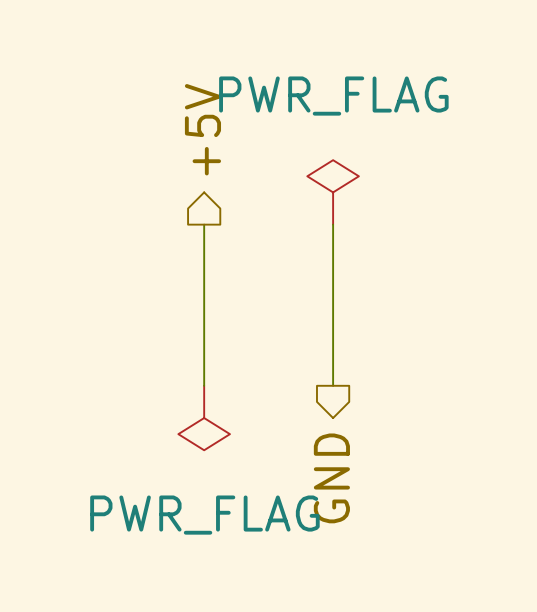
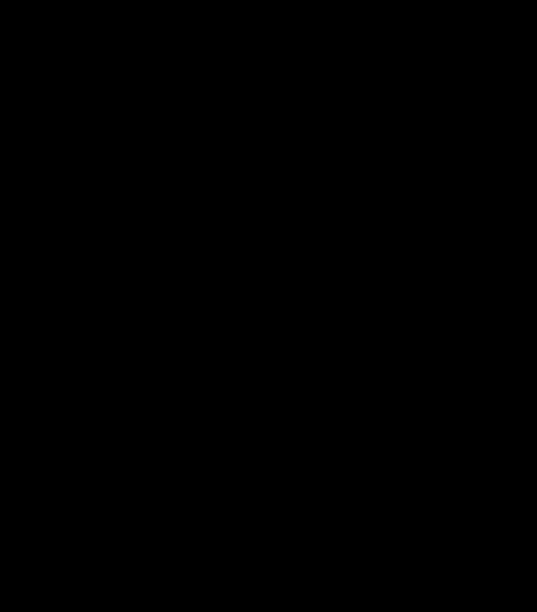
hierarchical label: +5V (202, 129) -> none
power symbol: PWR_FLAG (333, 192) -> none
wire: (204, 224) (204, 385) -> none
wire: (333, 224) (333, 385) -> none
power symbol: PWR_FLAG (204, 418) -> none
hierarchical label: GND (331, 478) -> none

